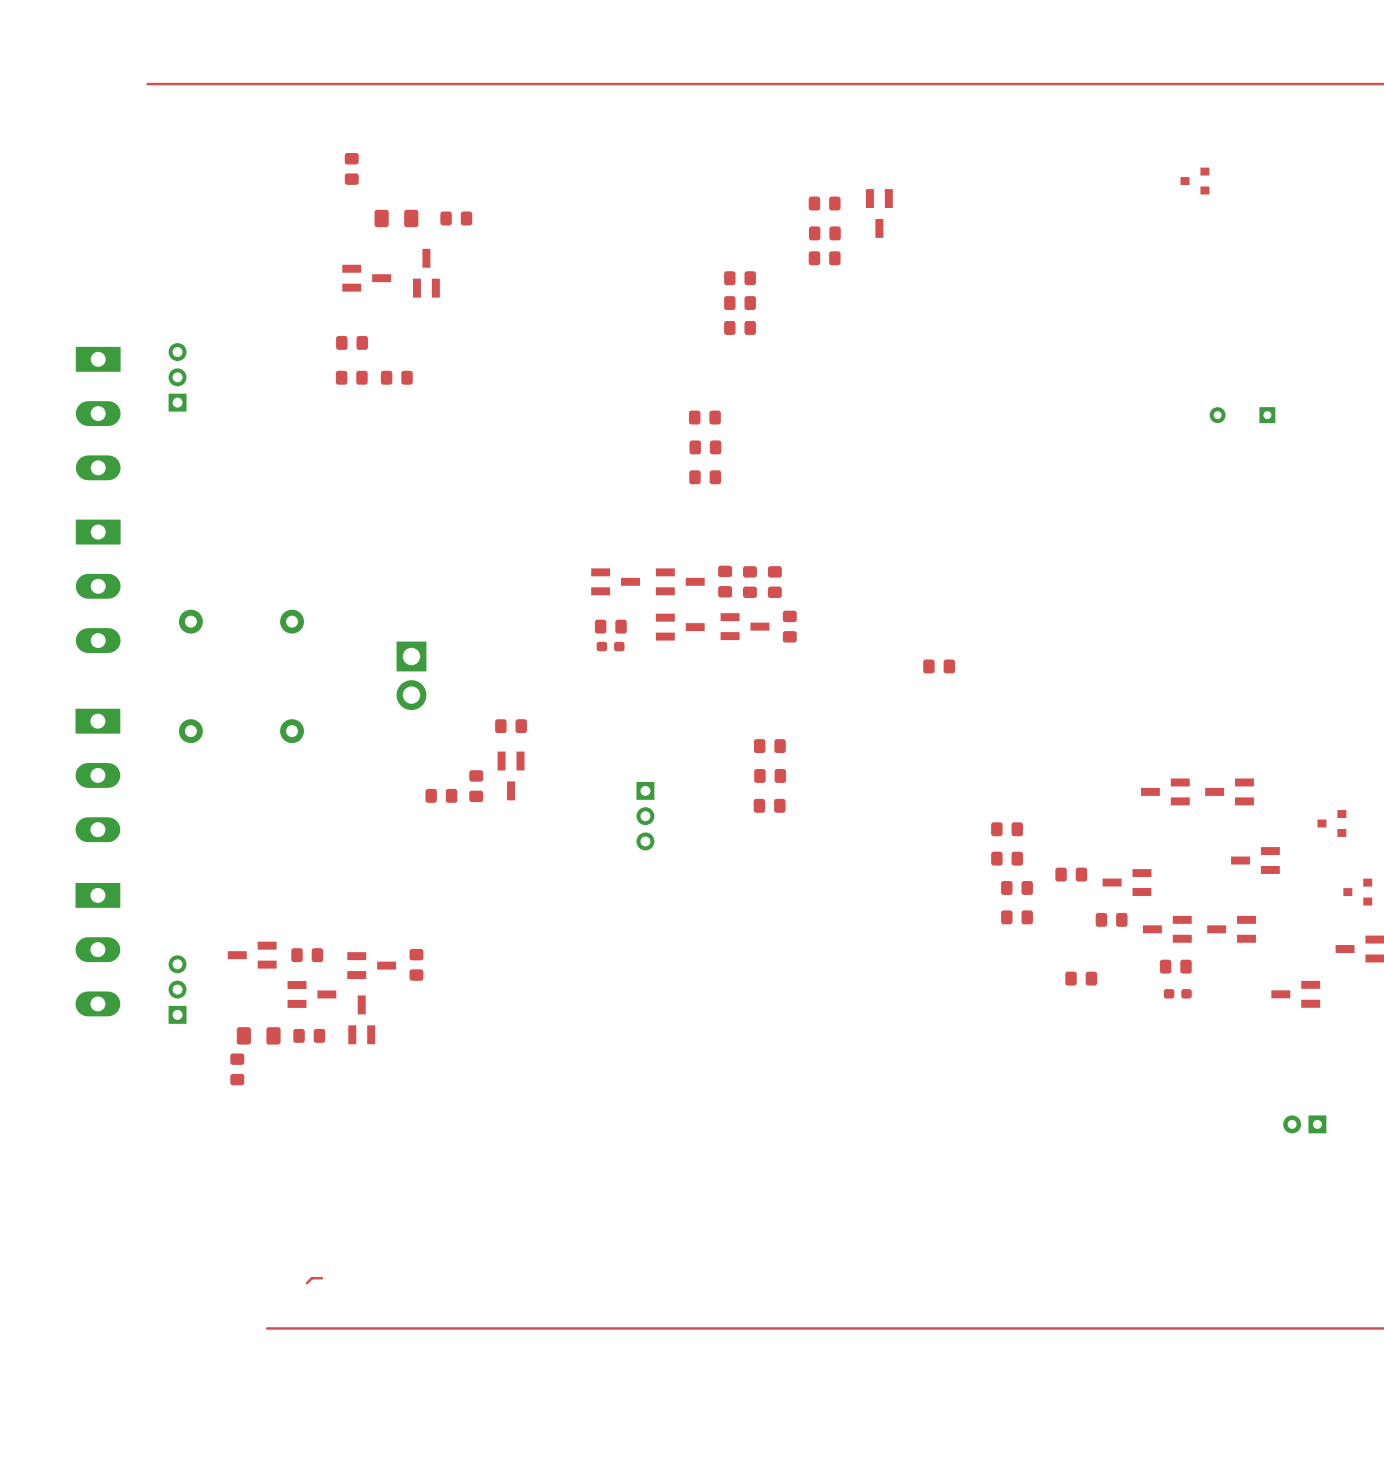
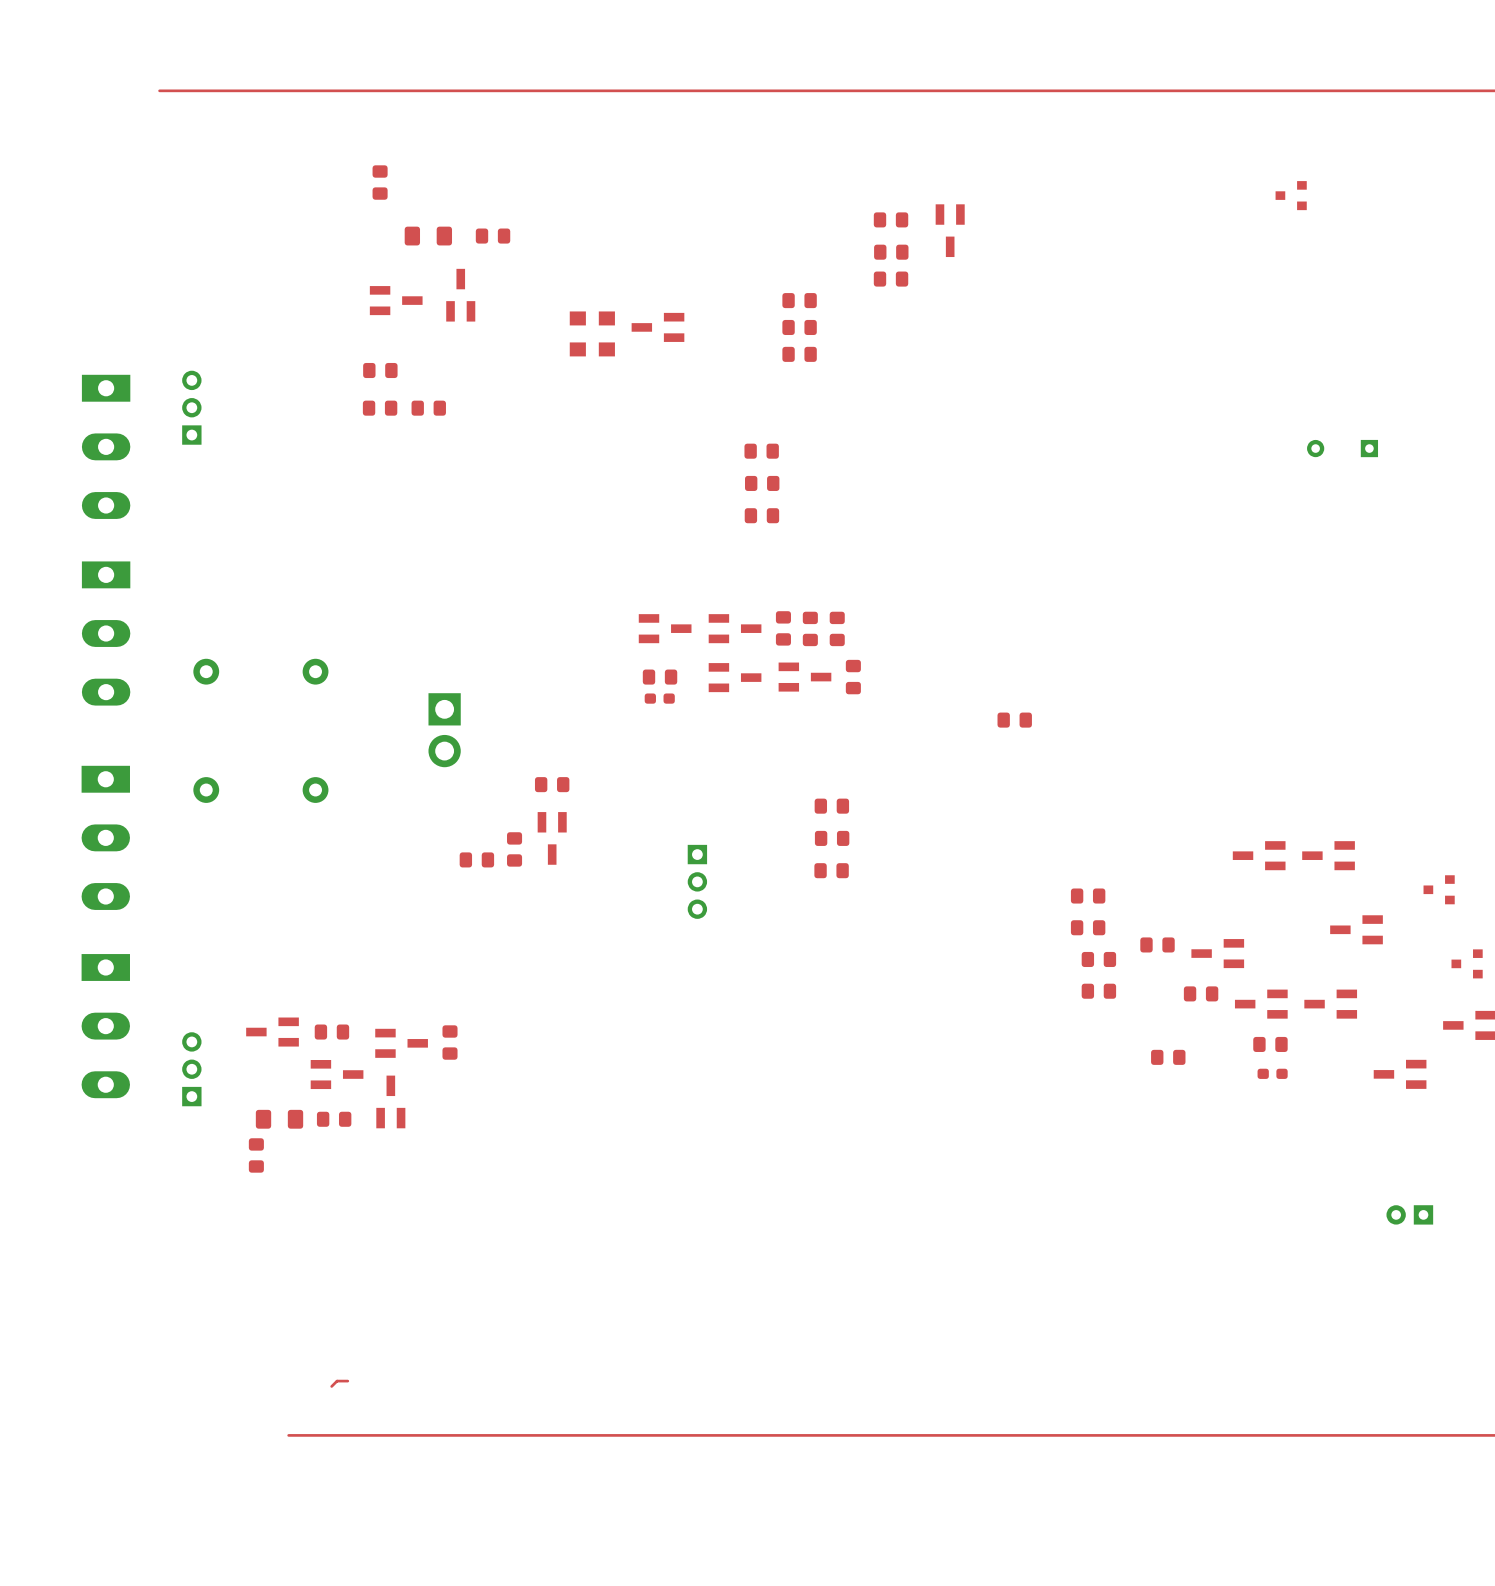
part: none -> (592, 318)
part: none -> (657, 327)
part: none -> (592, 349)

